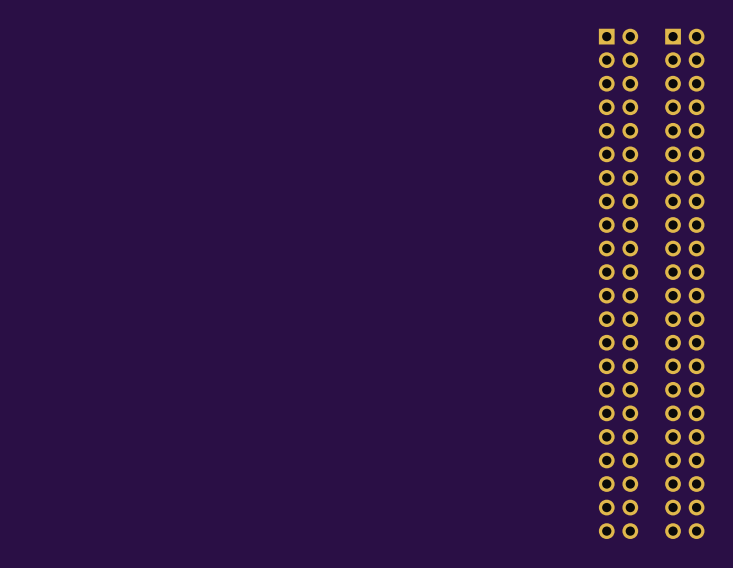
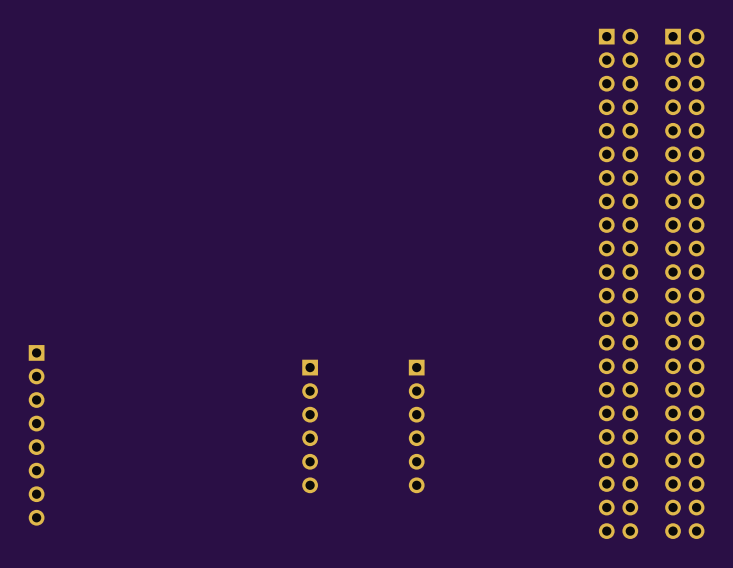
part: none -> (310, 426)
part: none -> (416, 426)
part: none -> (36, 435)

